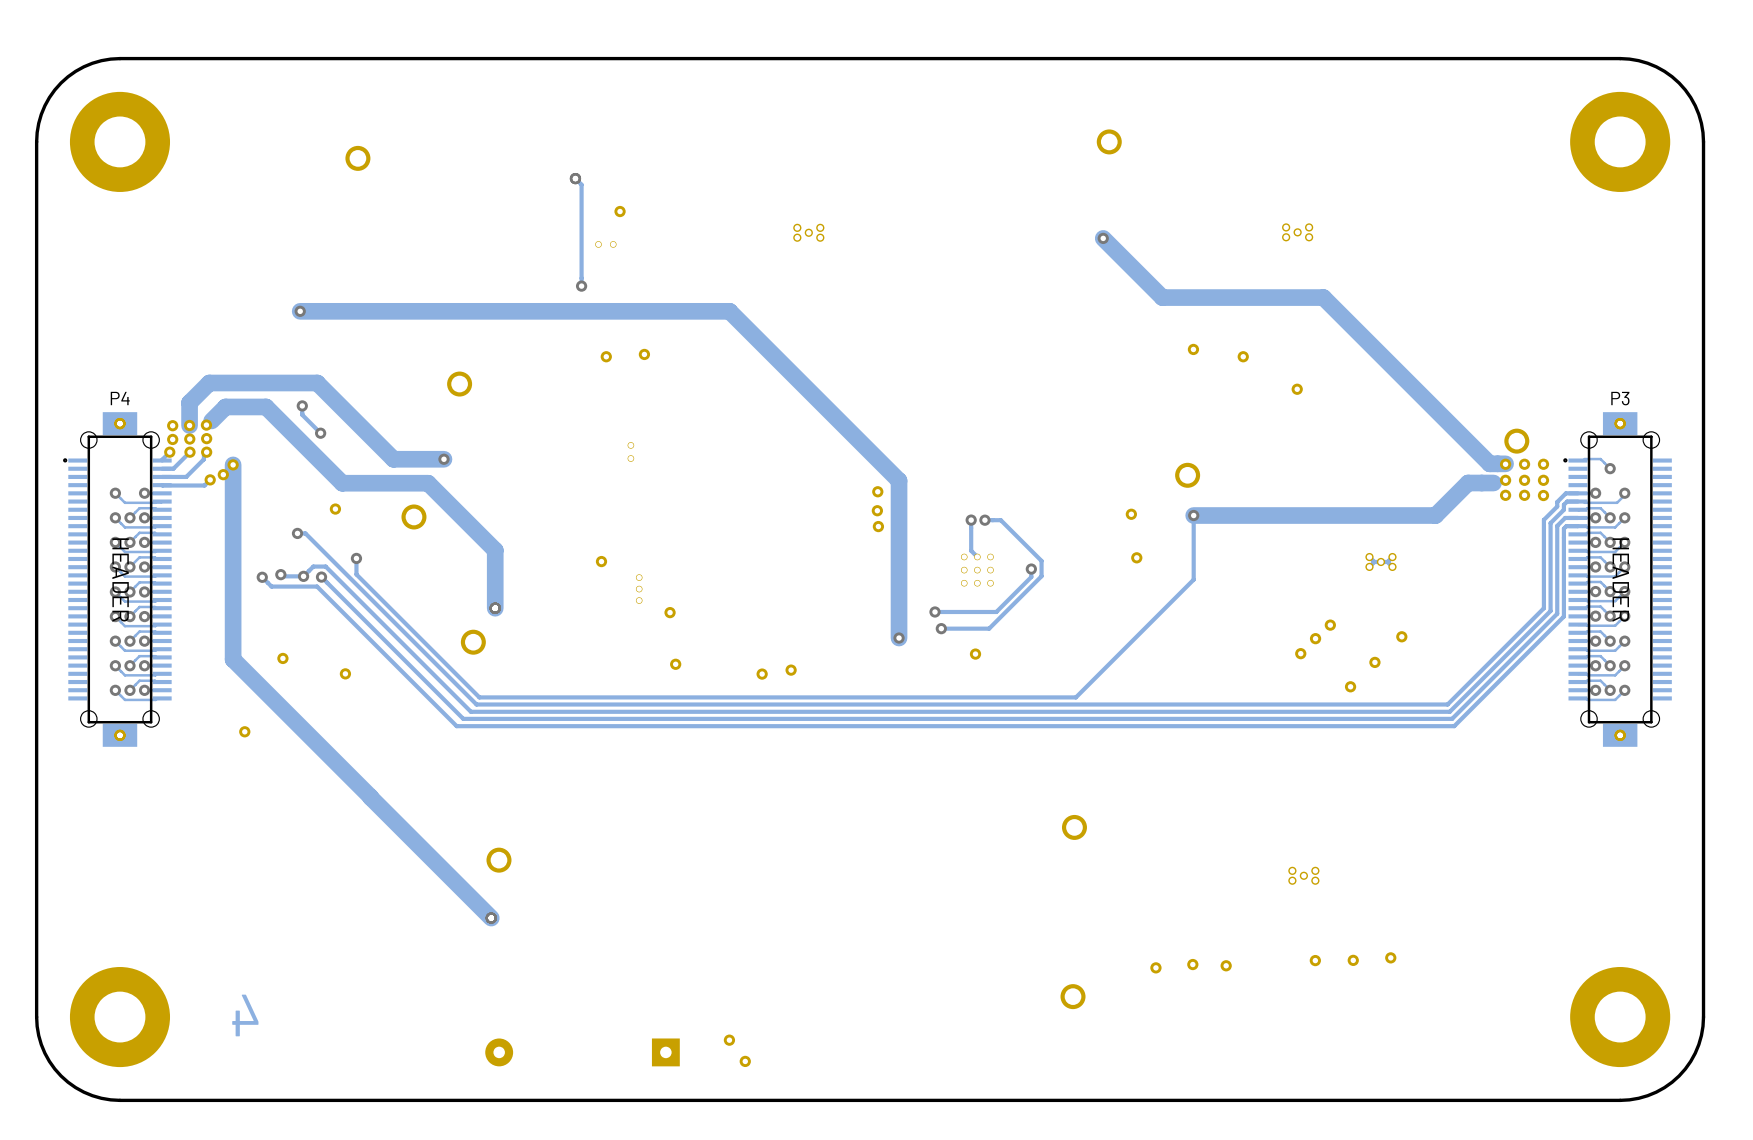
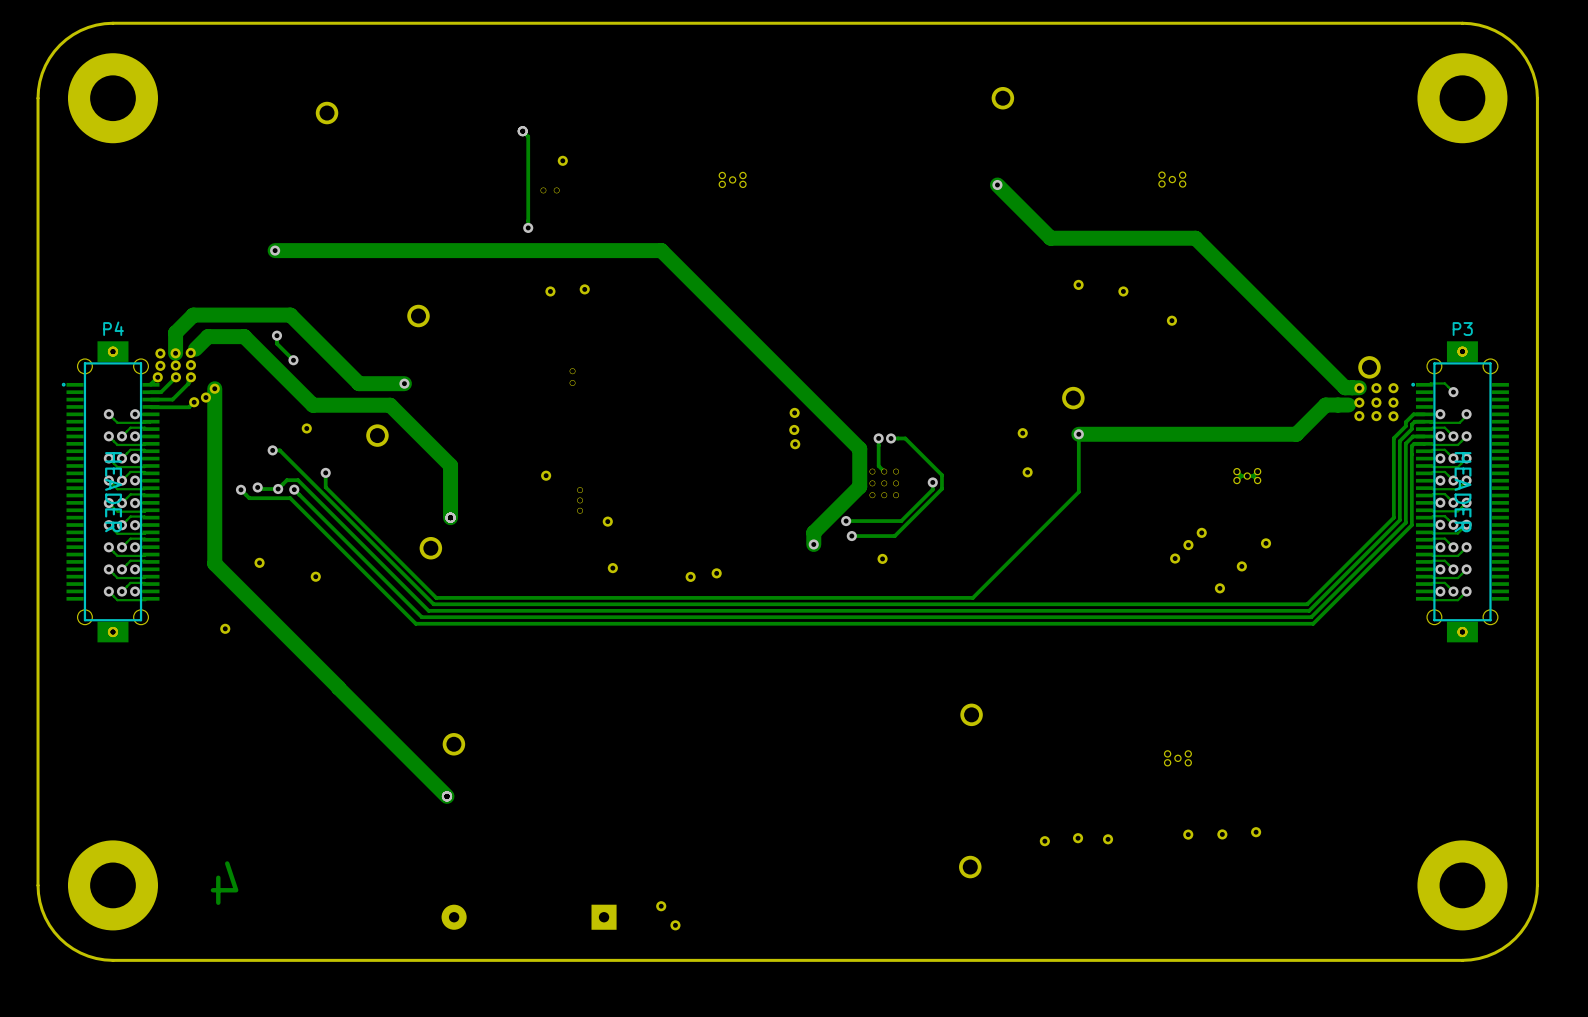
track: (899, 480) (899, 624) -> (813, 402) (859, 448) (859, 486) (813, 532)

